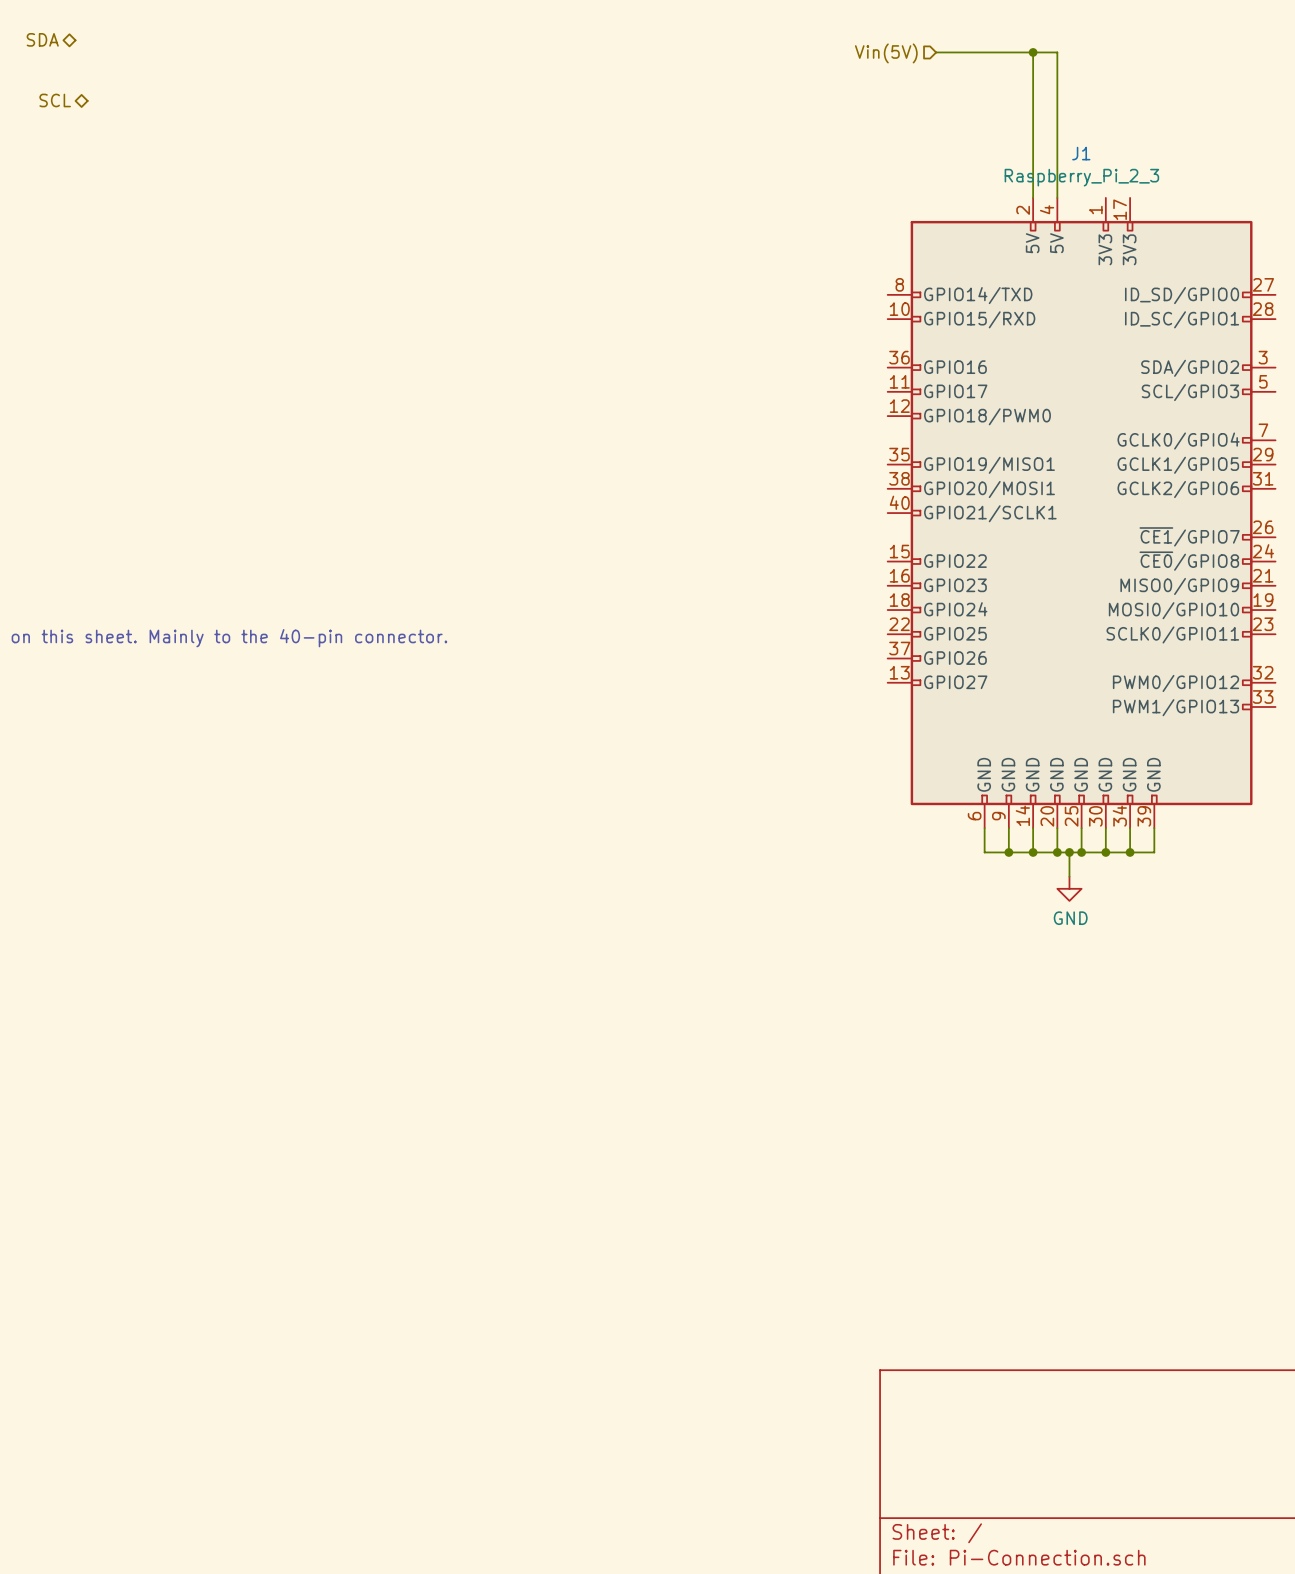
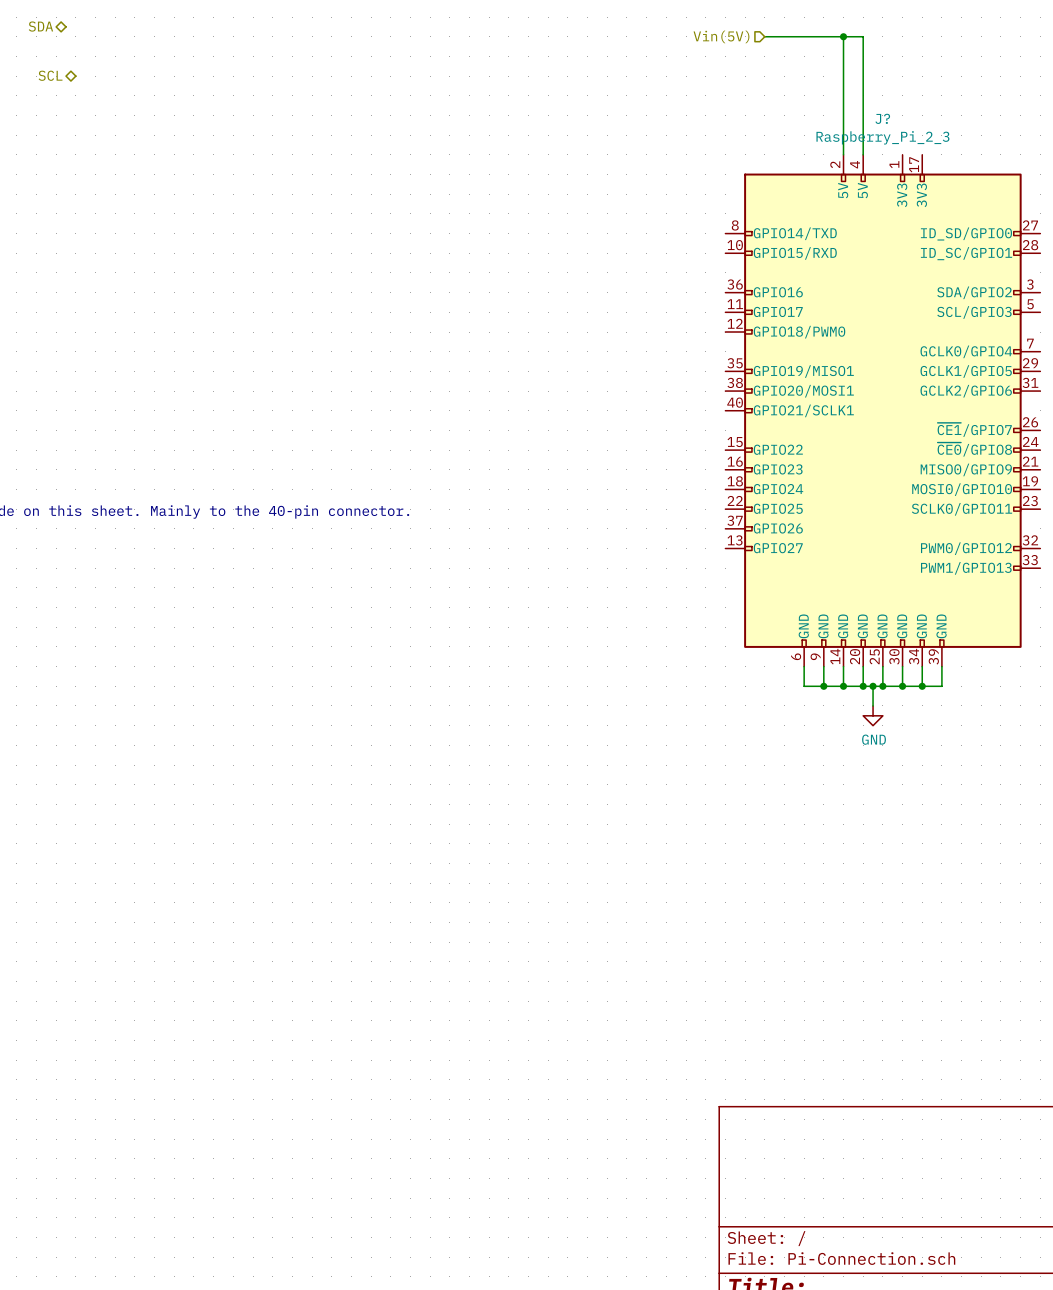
J1 name: J1 (1081, 153) -> J? (882, 118)

